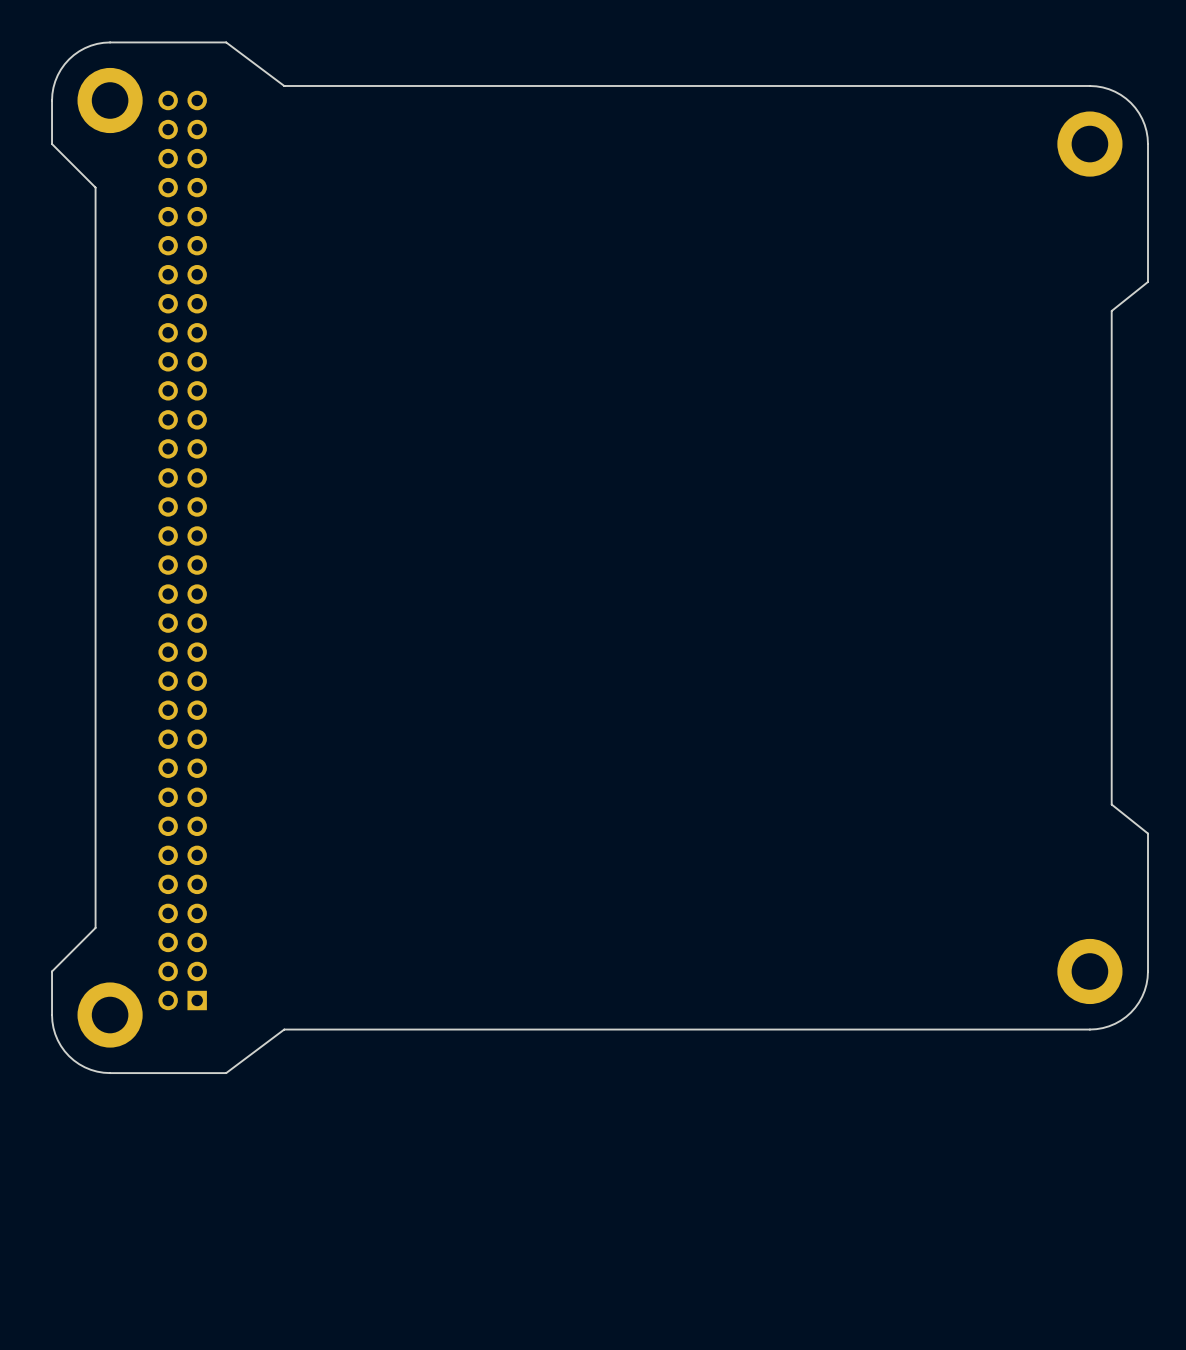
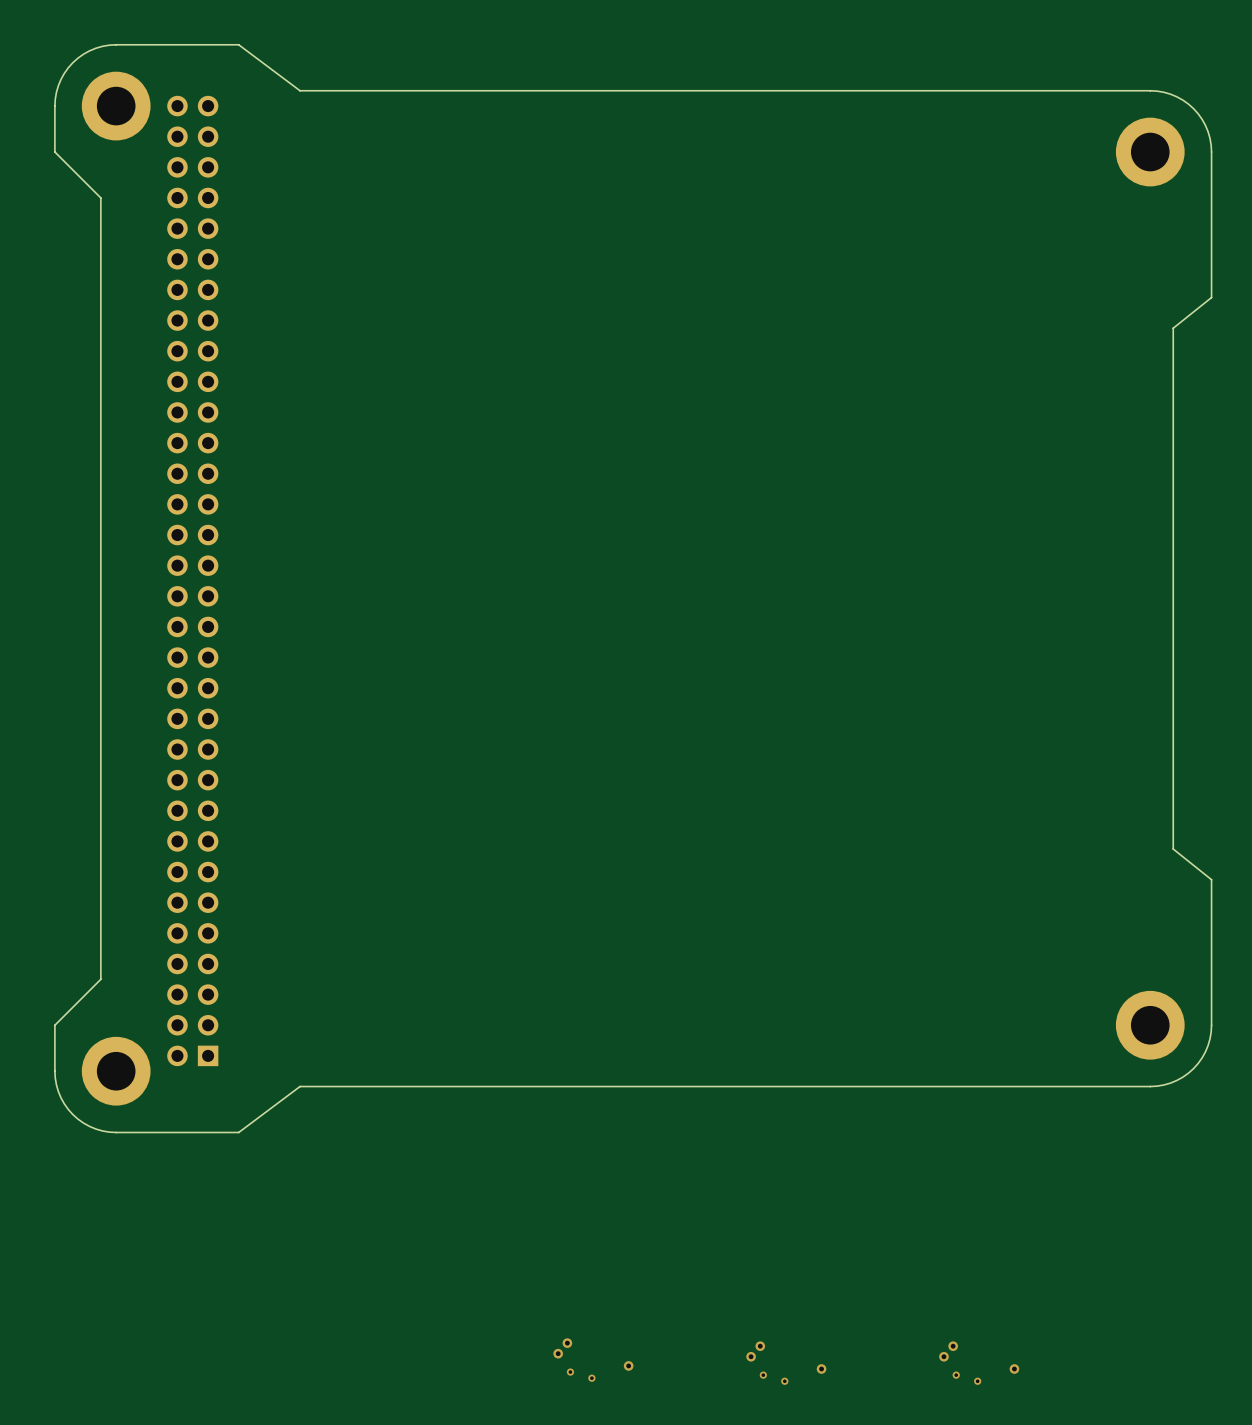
via: none -> (567, 1343)
via: none -> (760, 1346)
via: none -> (953, 1346)
via: none -> (558, 1353)
via: none -> (751, 1356)
via: none -> (943, 1356)
via: none -> (628, 1365)
via: none -> (821, 1369)
via: none -> (1014, 1369)
via: none -> (570, 1372)
via: none -> (763, 1375)
via: none -> (956, 1375)
via: none -> (591, 1378)
via: none -> (784, 1381)
via: none -> (977, 1381)

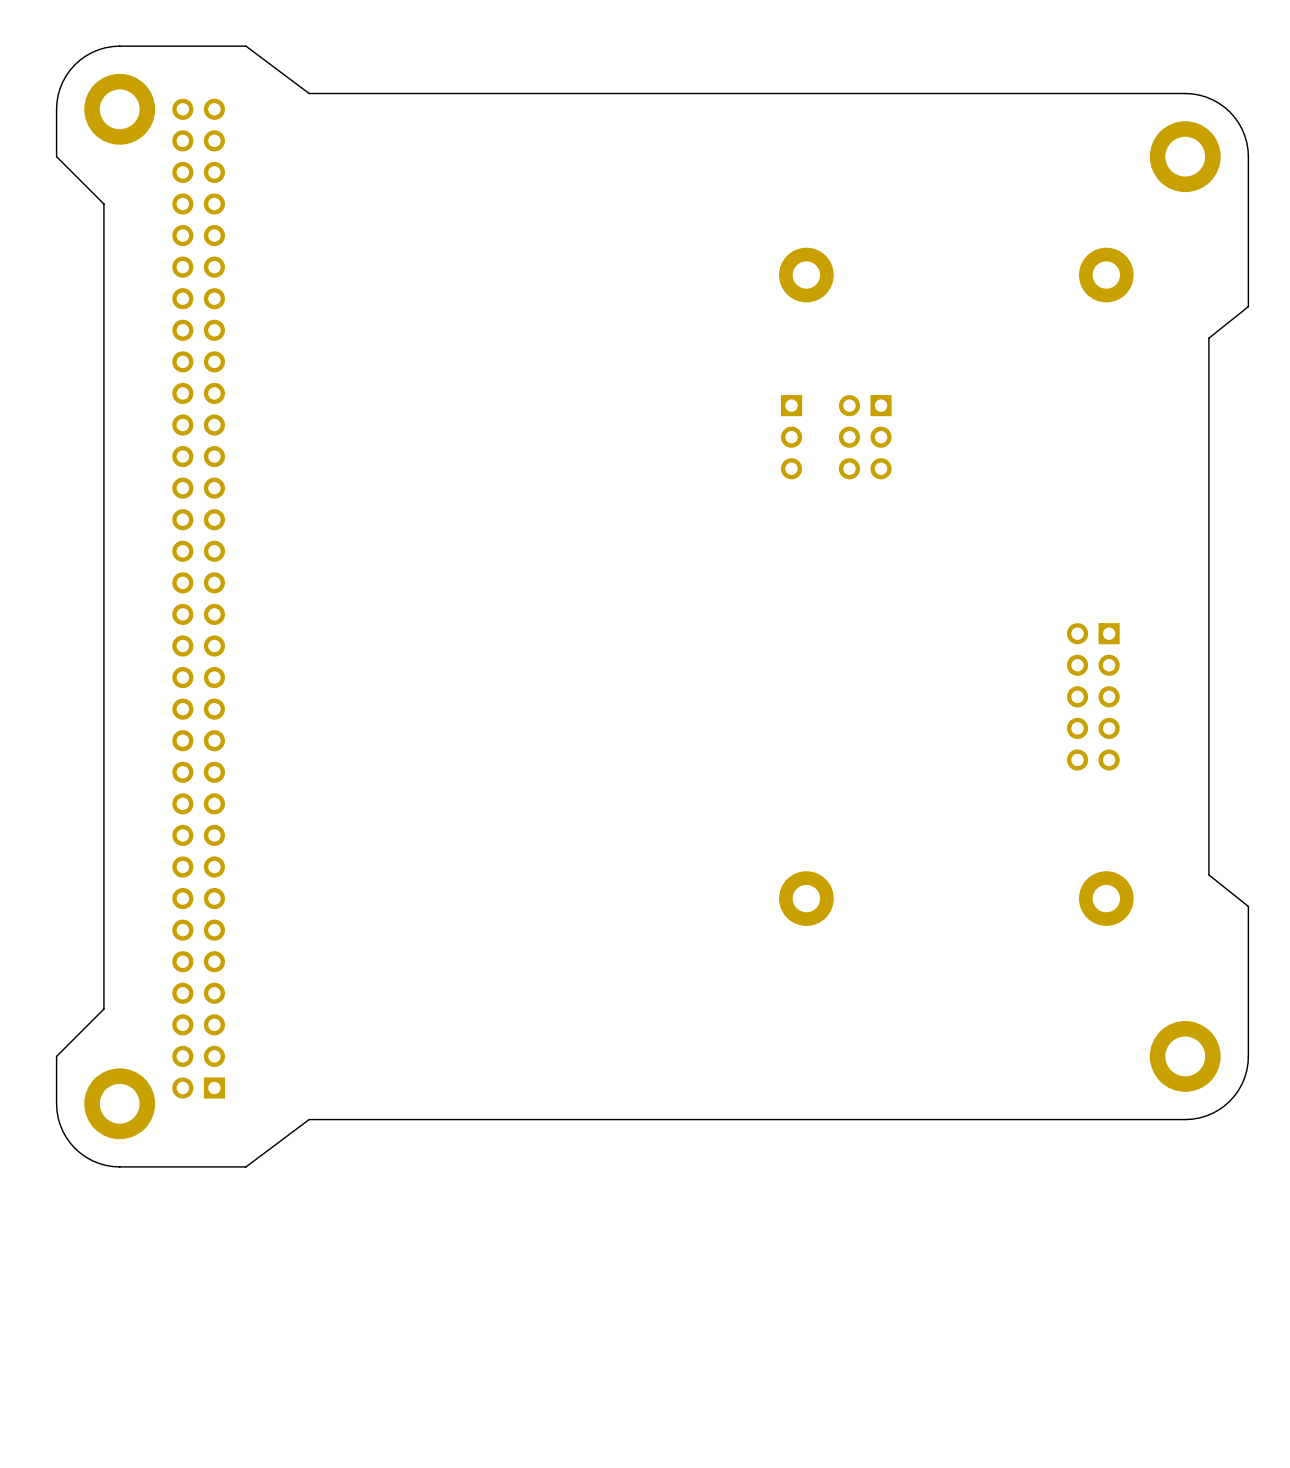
part: none -> (806, 275)
part: none -> (1106, 275)
part: none -> (791, 437)
part: none -> (865, 437)
part: none -> (1093, 696)
part: none -> (806, 898)
part: none -> (1106, 898)
via: (567, 1343) -> none
via: (760, 1346) -> none
via: (953, 1346) -> none
via: (558, 1353) -> none
via: (751, 1356) -> none
via: (943, 1356) -> none
via: (628, 1365) -> none
via: (821, 1369) -> none
via: (1014, 1369) -> none
via: (570, 1372) -> none
via: (763, 1375) -> none
via: (956, 1375) -> none
via: (591, 1378) -> none
via: (784, 1381) -> none
via: (977, 1381) -> none

